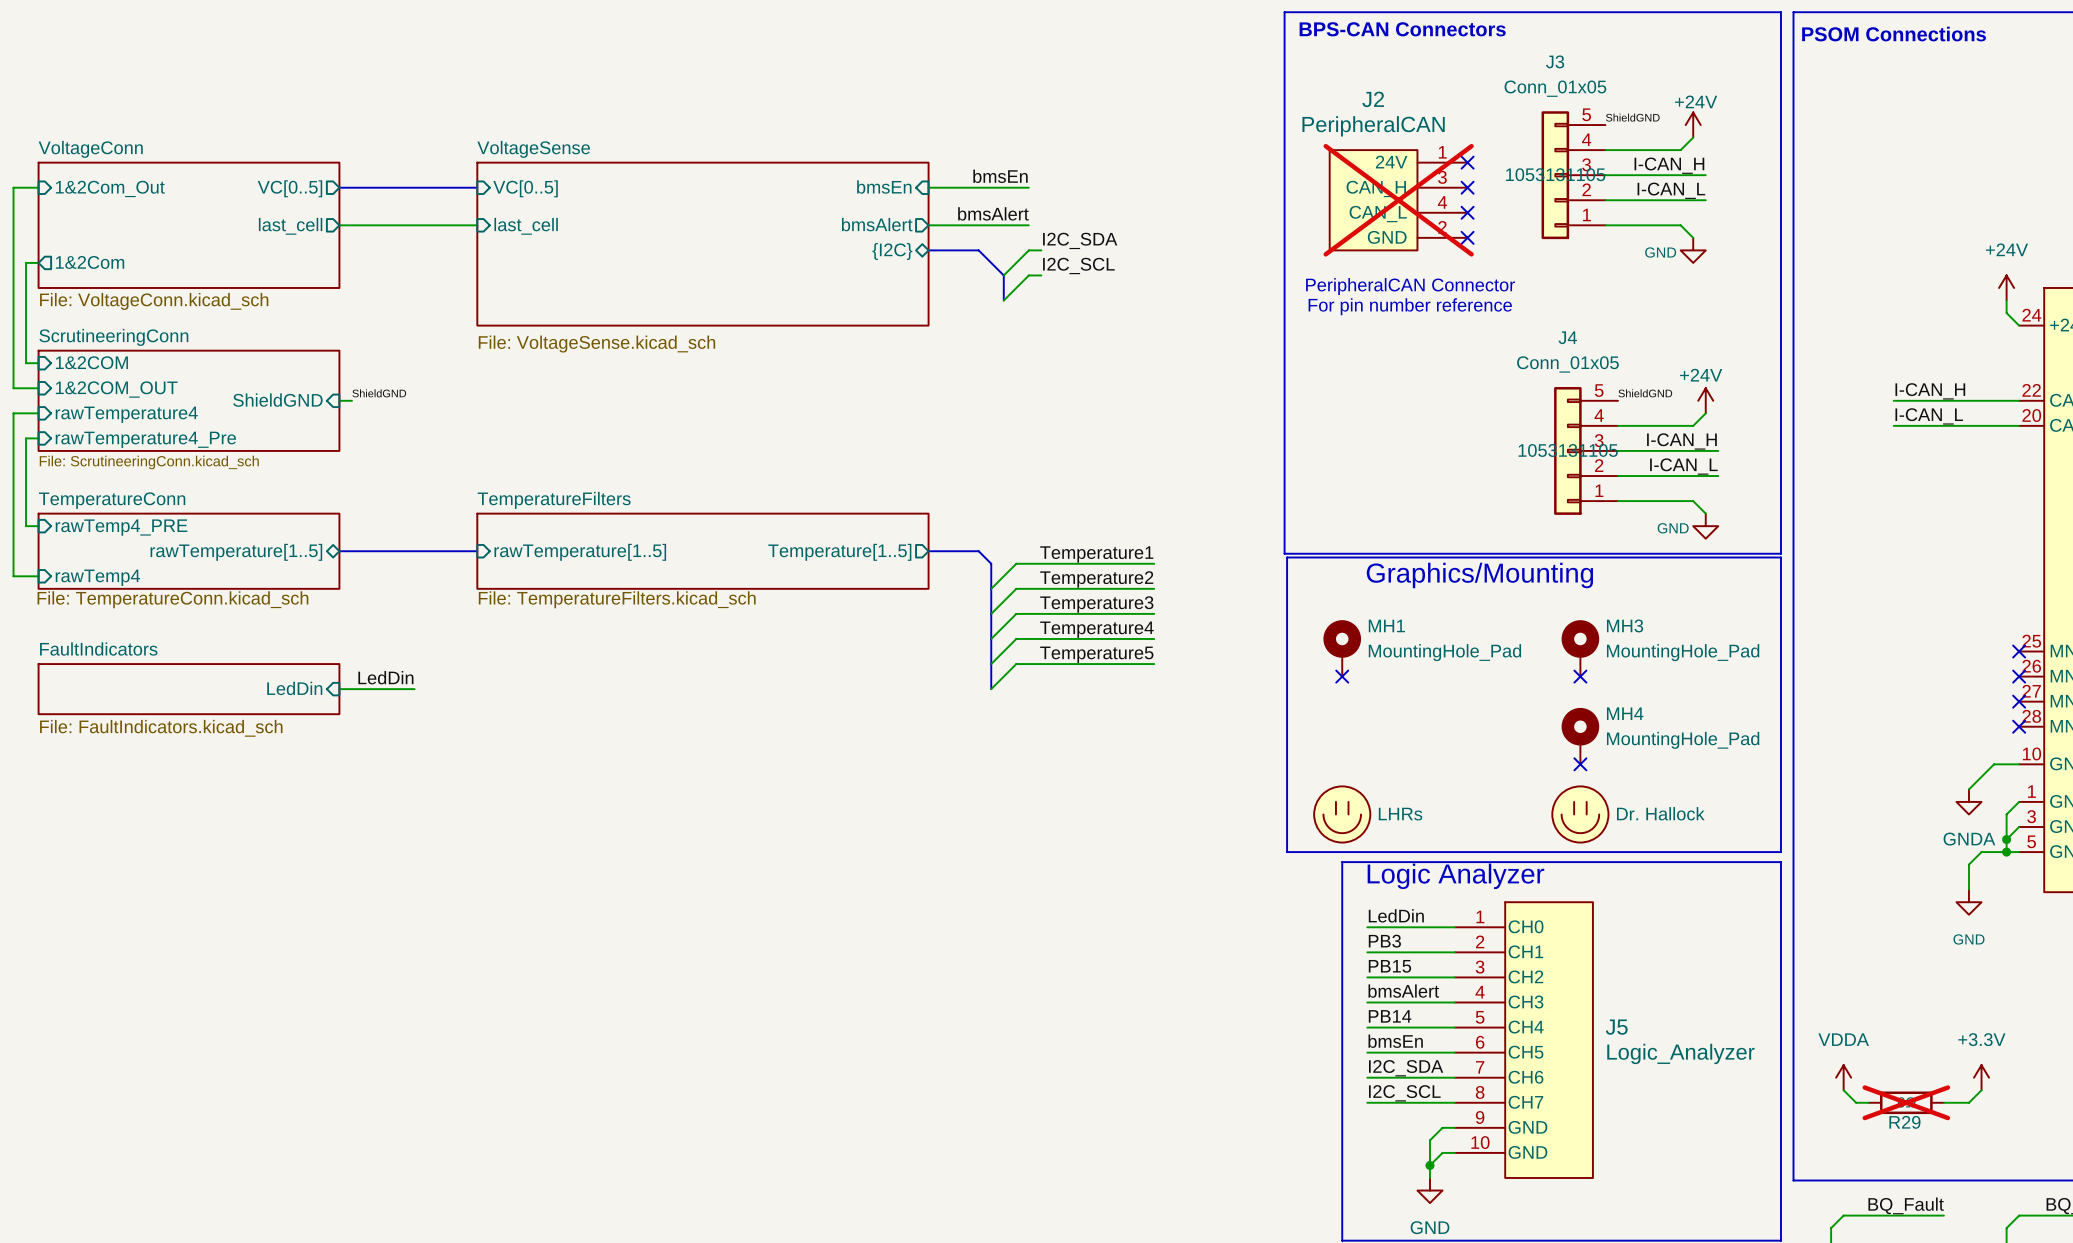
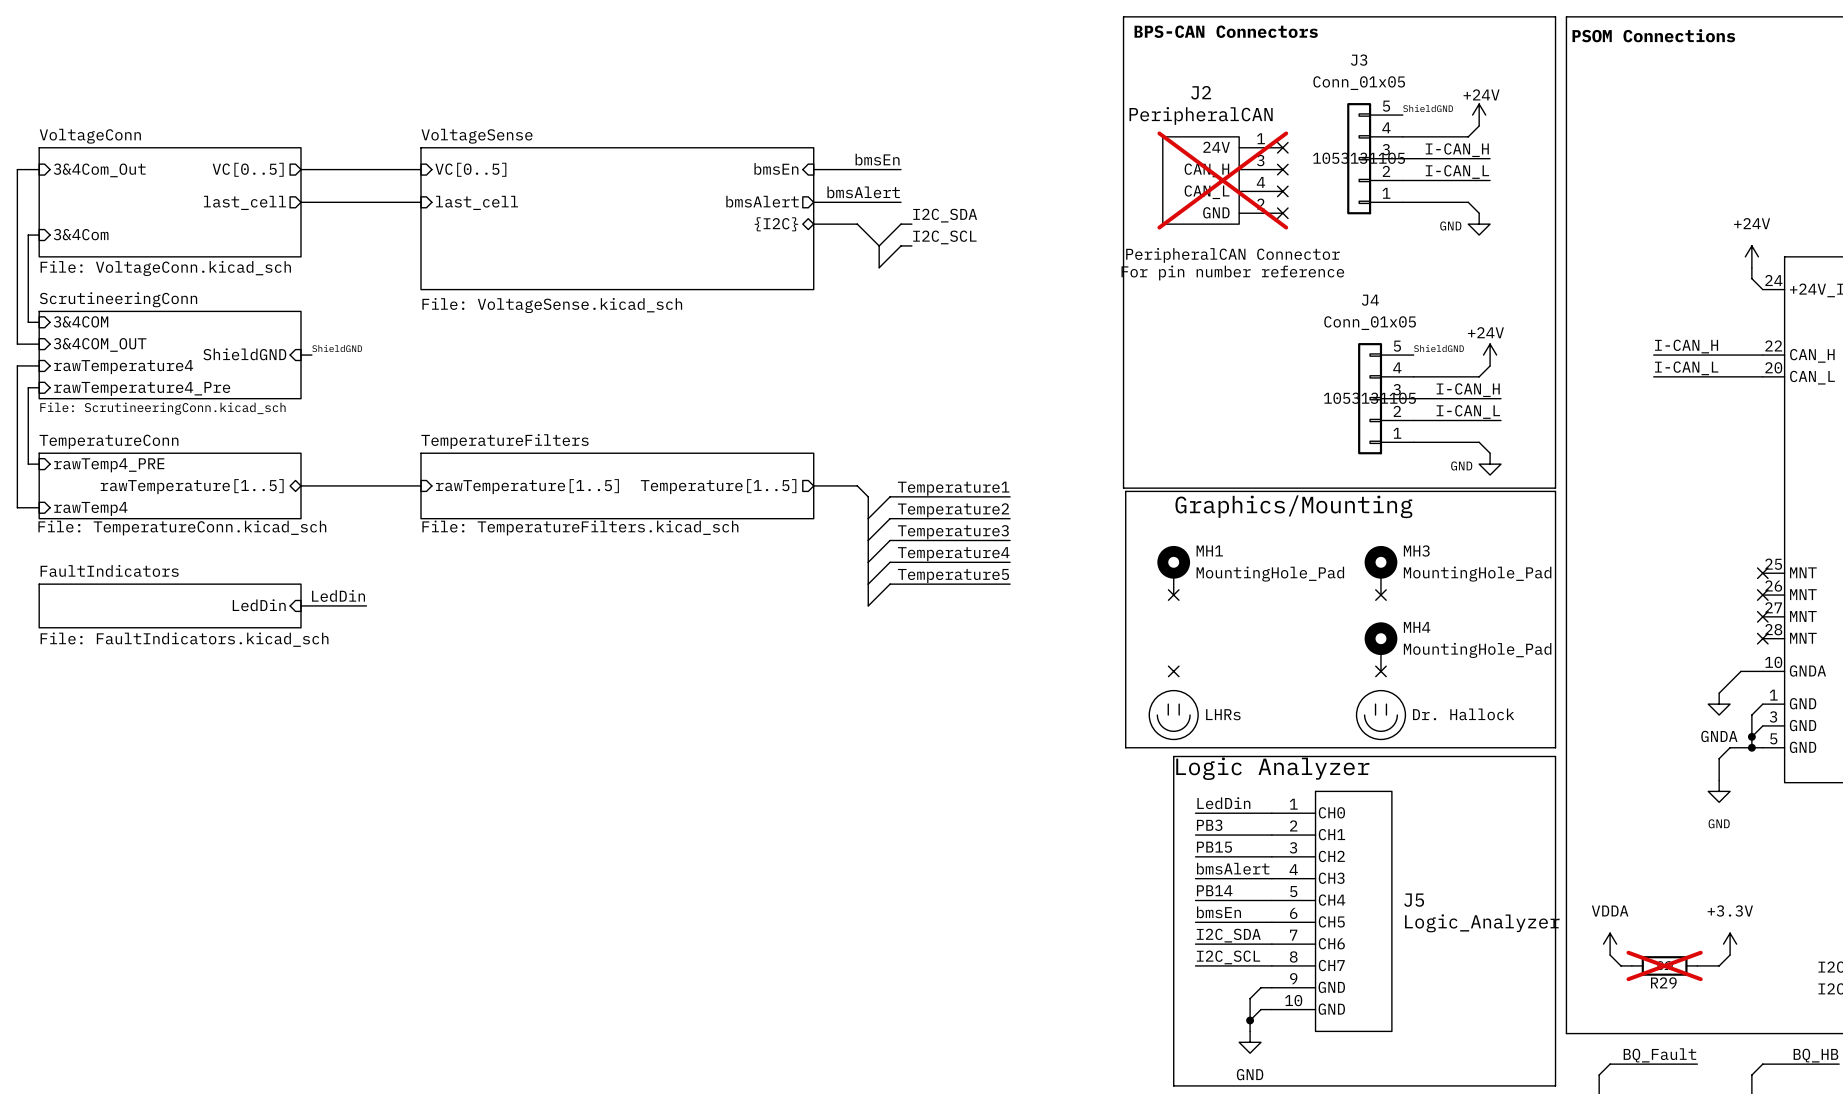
sheet pin: 1&2Com_Out (110, 188) -> 3&4Com_Out (99, 170)
sheet pin shape: output (90, 262) -> input (81, 234)
sheet pin: 1&2Com (90, 262) -> 3&4Com (81, 234)
sheet pin: 1&2COM (91, 362) -> 3&4COM (81, 321)
sheet pin: 1&2COM_OUT (116, 389) -> 3&4COM_OUT (100, 344)
no-connect mark: none -> (1173, 671)

